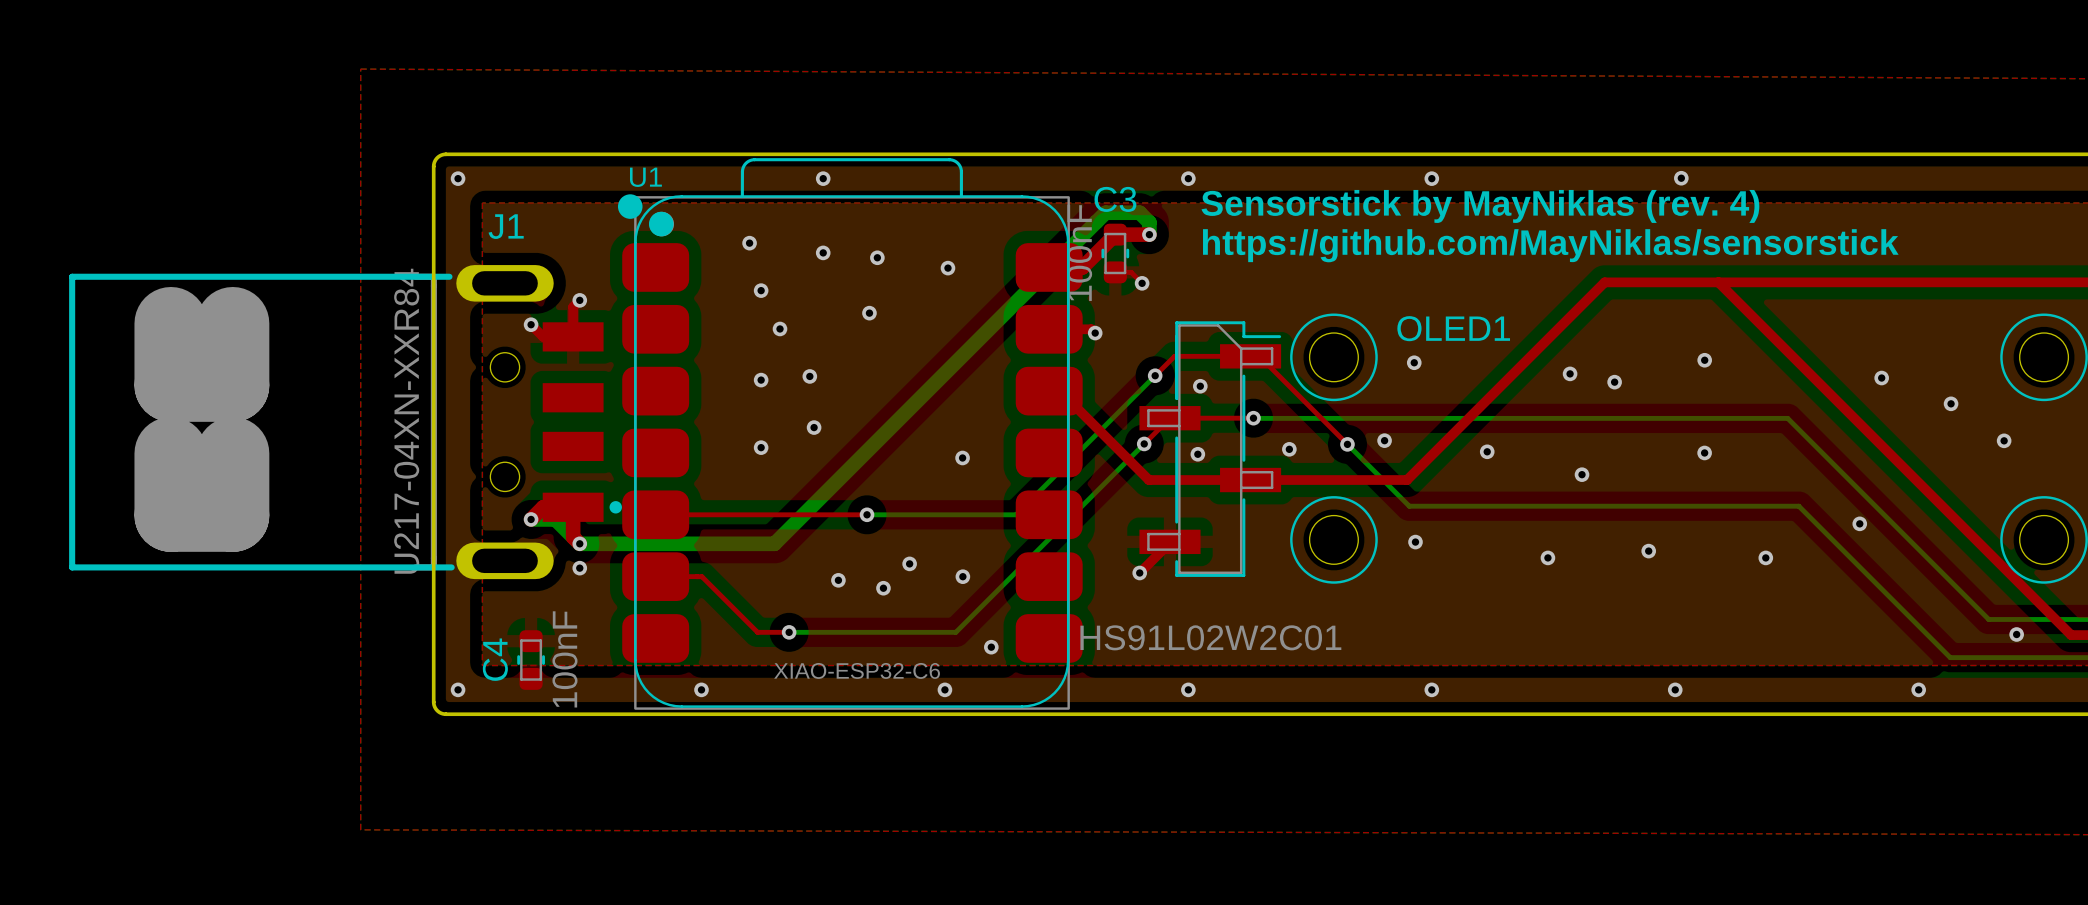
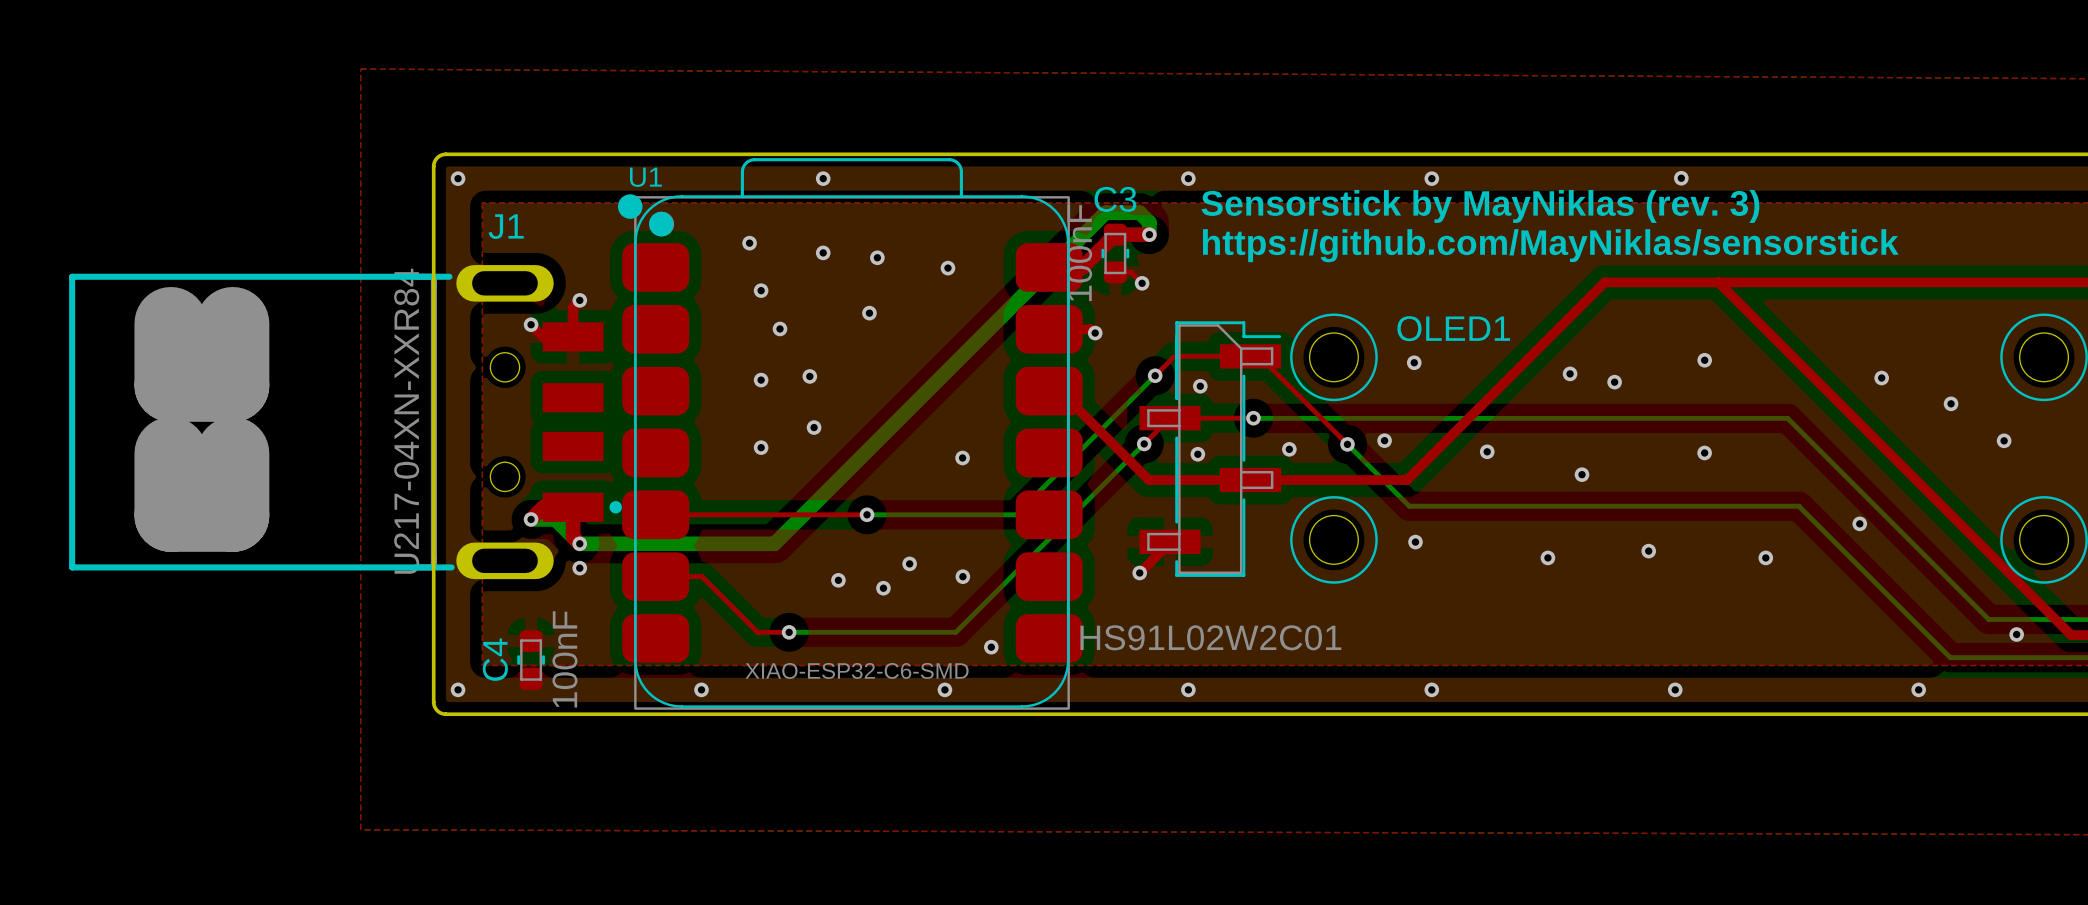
text: Sensorstick by MayNiklas (rev. 4) (1480, 206) -> Sensorstick by MayNiklas (rev. 3) (1480, 206)
U1 value: XIAO-ESP32-C6 (857, 670) -> XIAO-ESP32-C6-SMD (857, 670)

